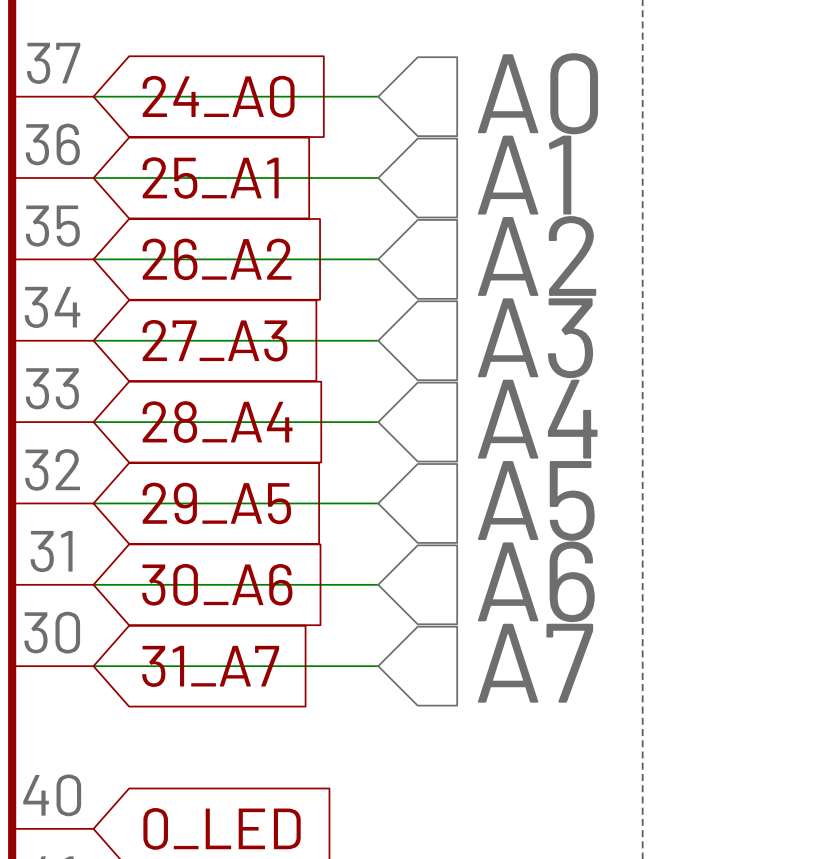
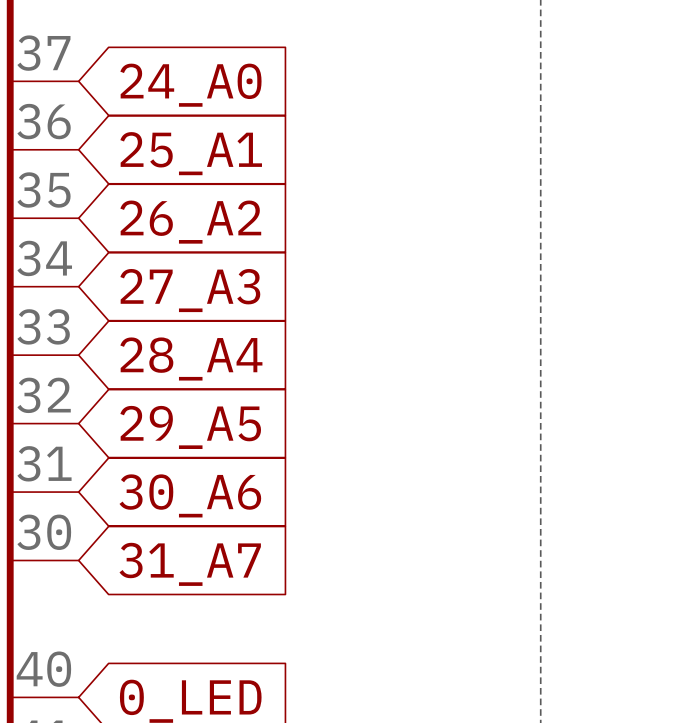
hierarchical label: A0 (537, 93) -> none
wire: (93, 96) (378, 96) -> none
hierarchical label: A1 (524, 175) -> none
wire: (93, 178) (378, 178) -> none
hierarchical label: A2 (536, 255) -> none
wire: (93, 259) (378, 259) -> none
hierarchical label: A3 (535, 338) -> none
wire: (93, 340) (378, 340) -> none
hierarchical label: A4 (537, 419) -> none
wire: (93, 422) (378, 422) -> none
hierarchical label: A5 (536, 500) -> none
wire: (93, 503) (378, 503) -> none
hierarchical label: A6 (536, 581) -> none
wire: (93, 584) (378, 584) -> none
hierarchical label: A7 (535, 663) -> none
wire: (93, 666) (378, 666) -> none

